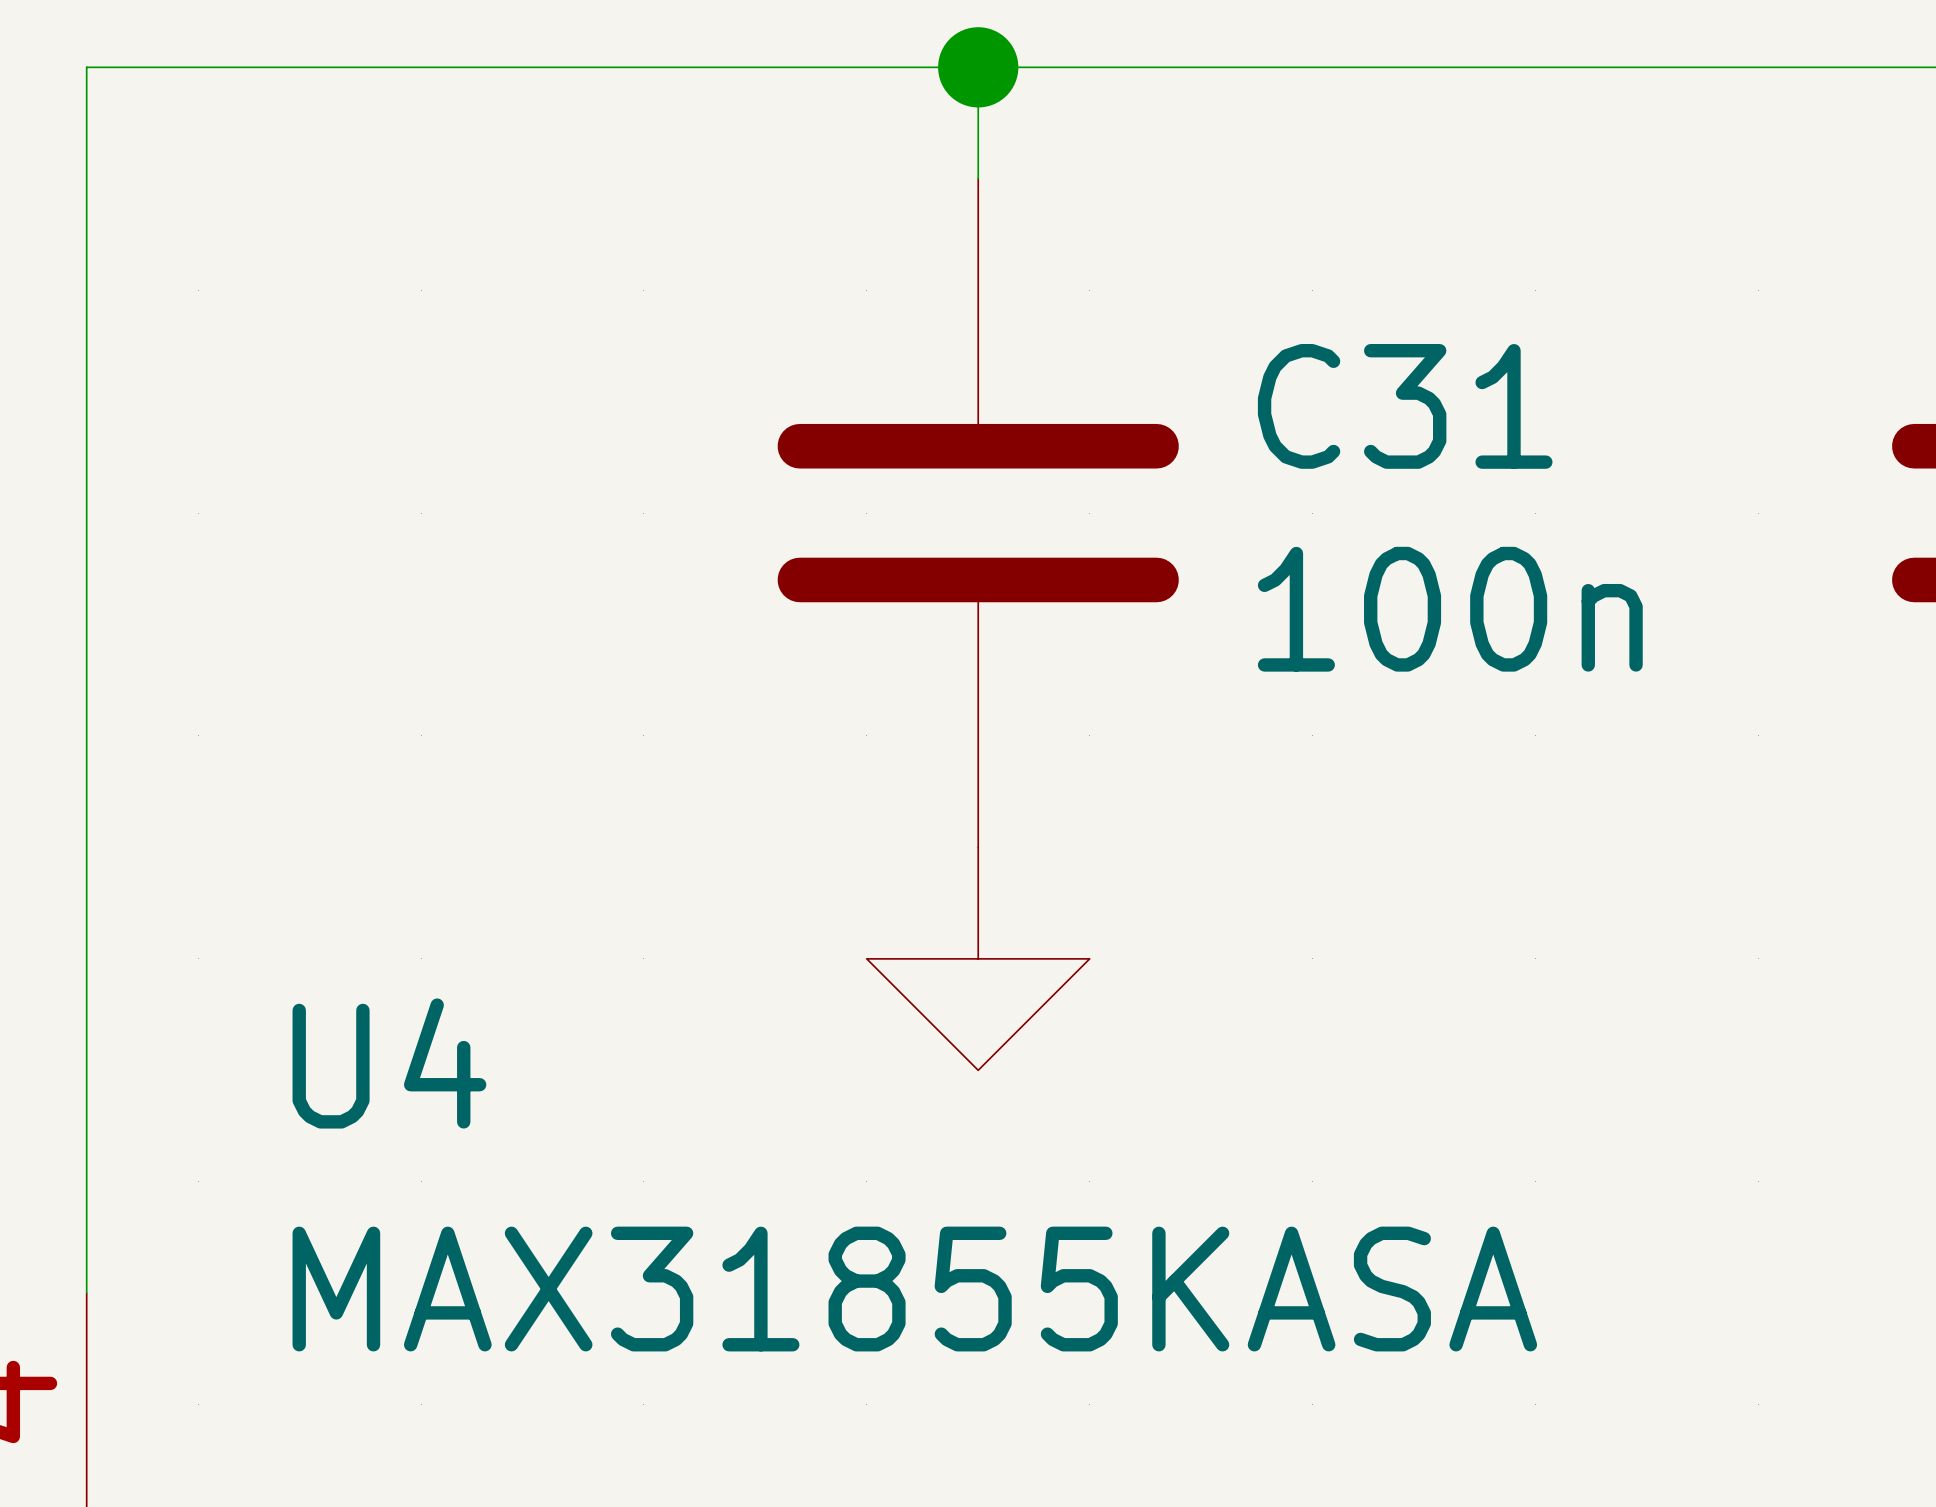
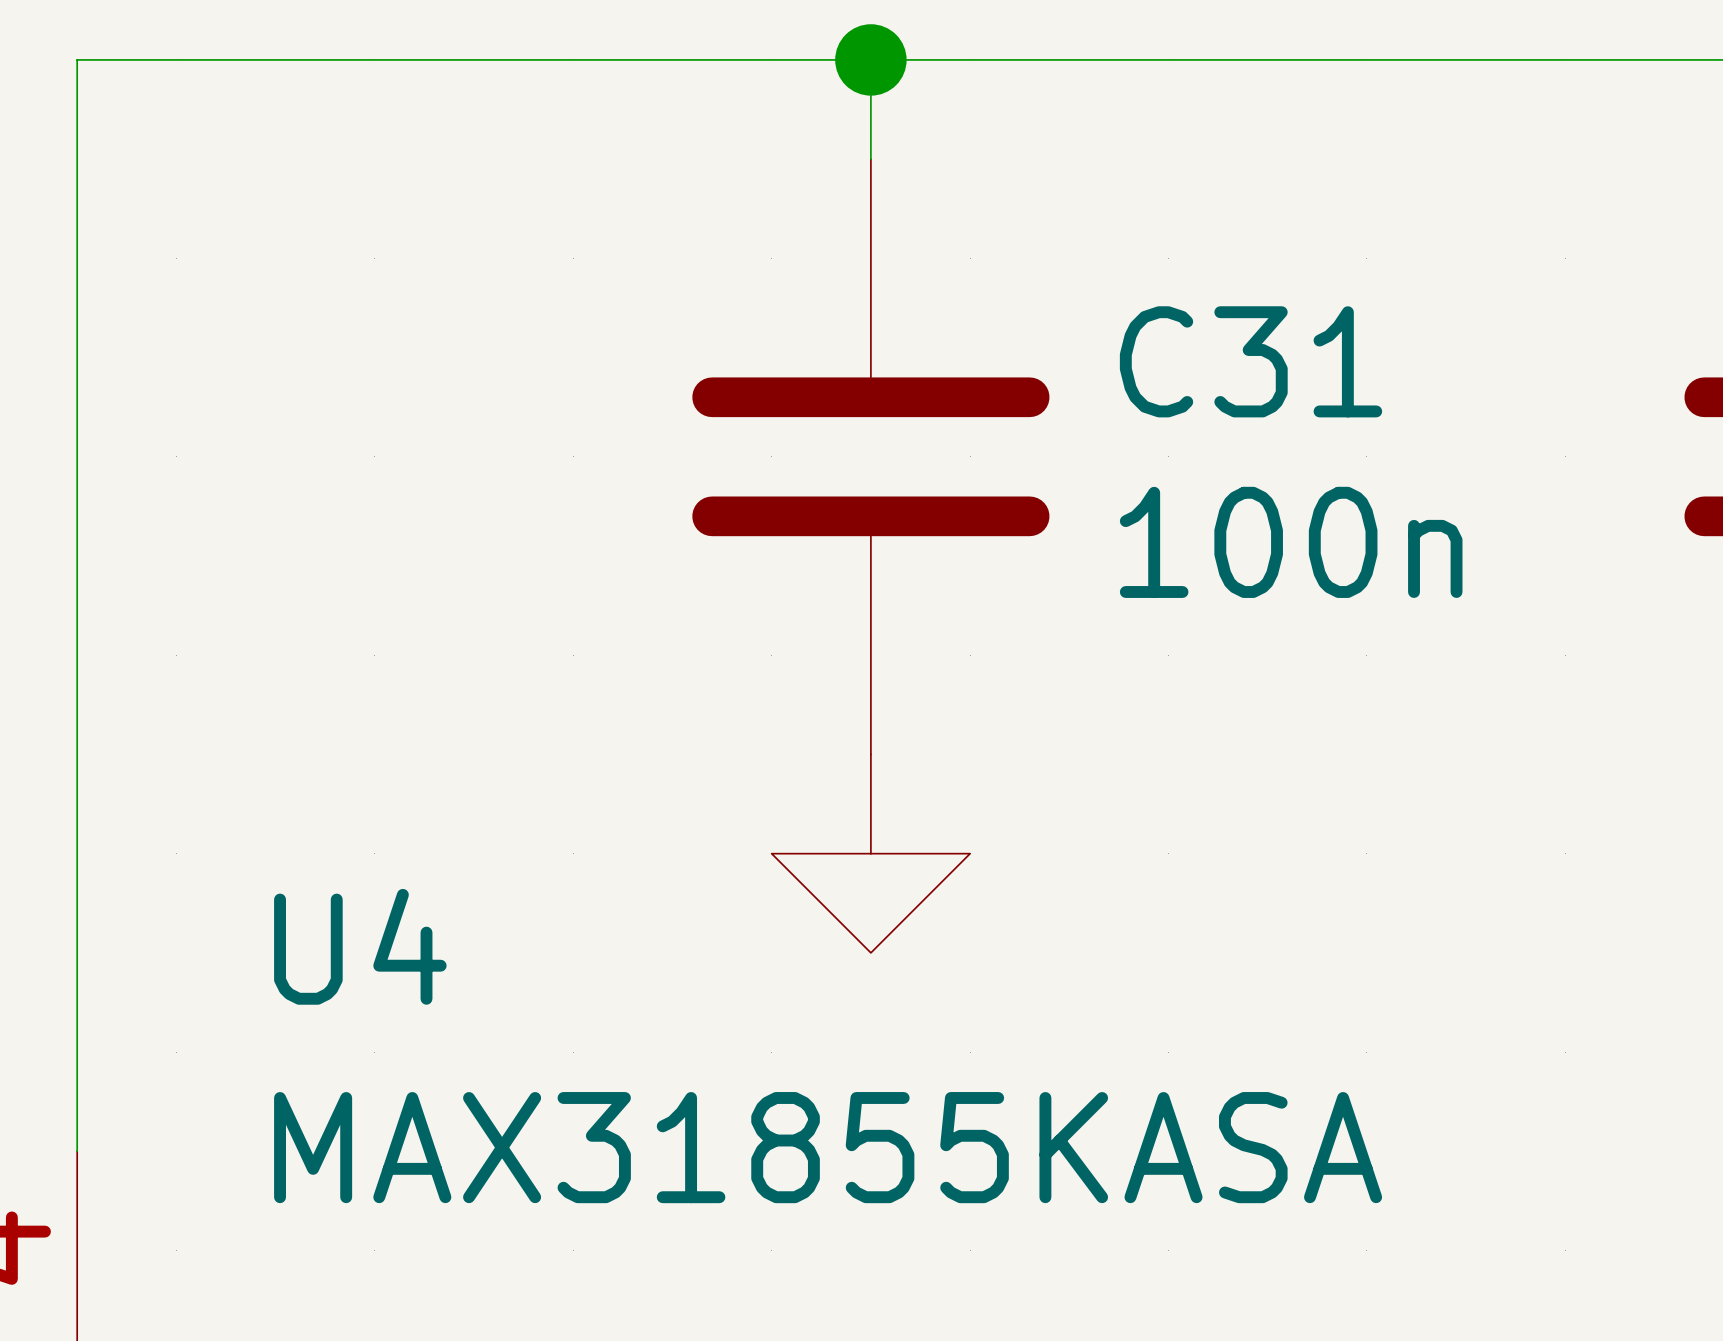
U4 name position: U4 (389, 1063) -> U4 (360, 946)
U4 value position: MAX31855KASA (914, 1289) -> MAX31855KASA (828, 1147)

